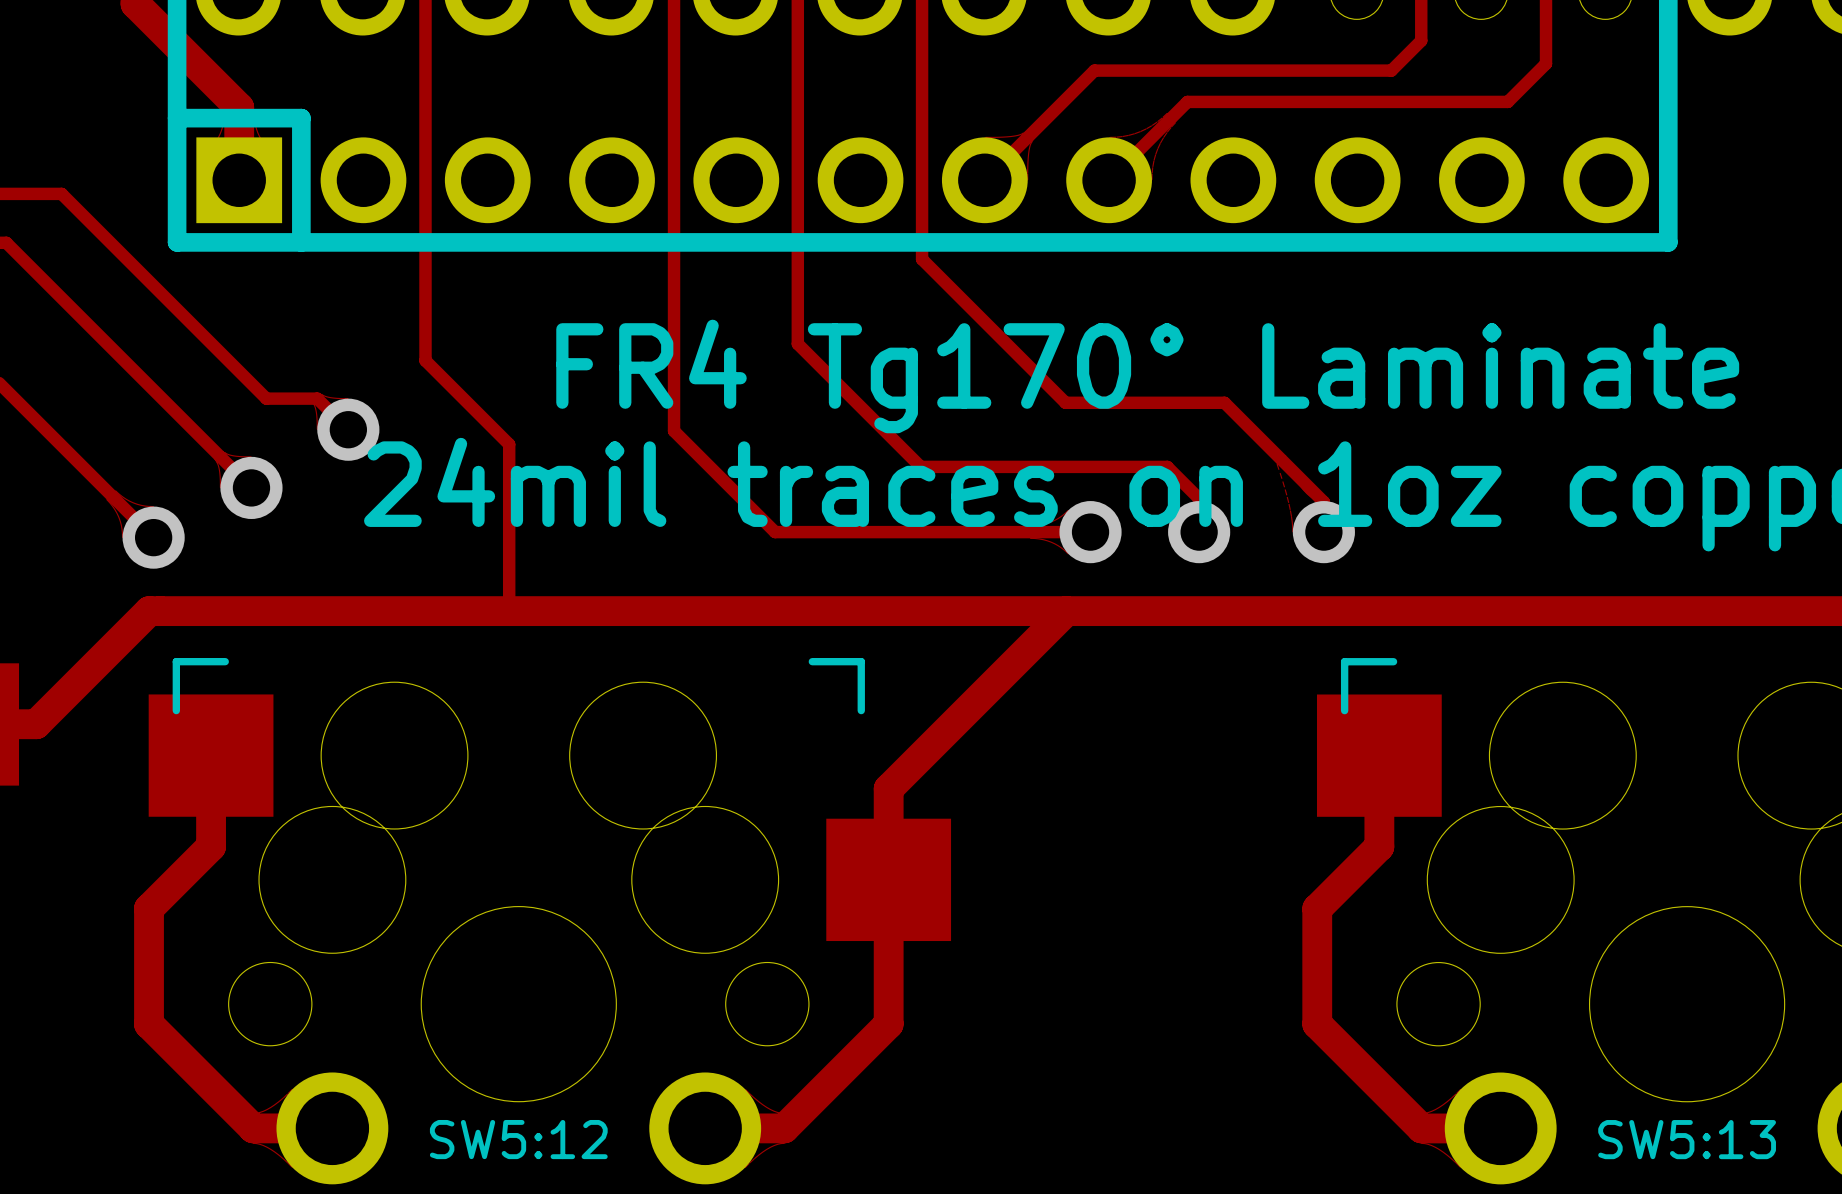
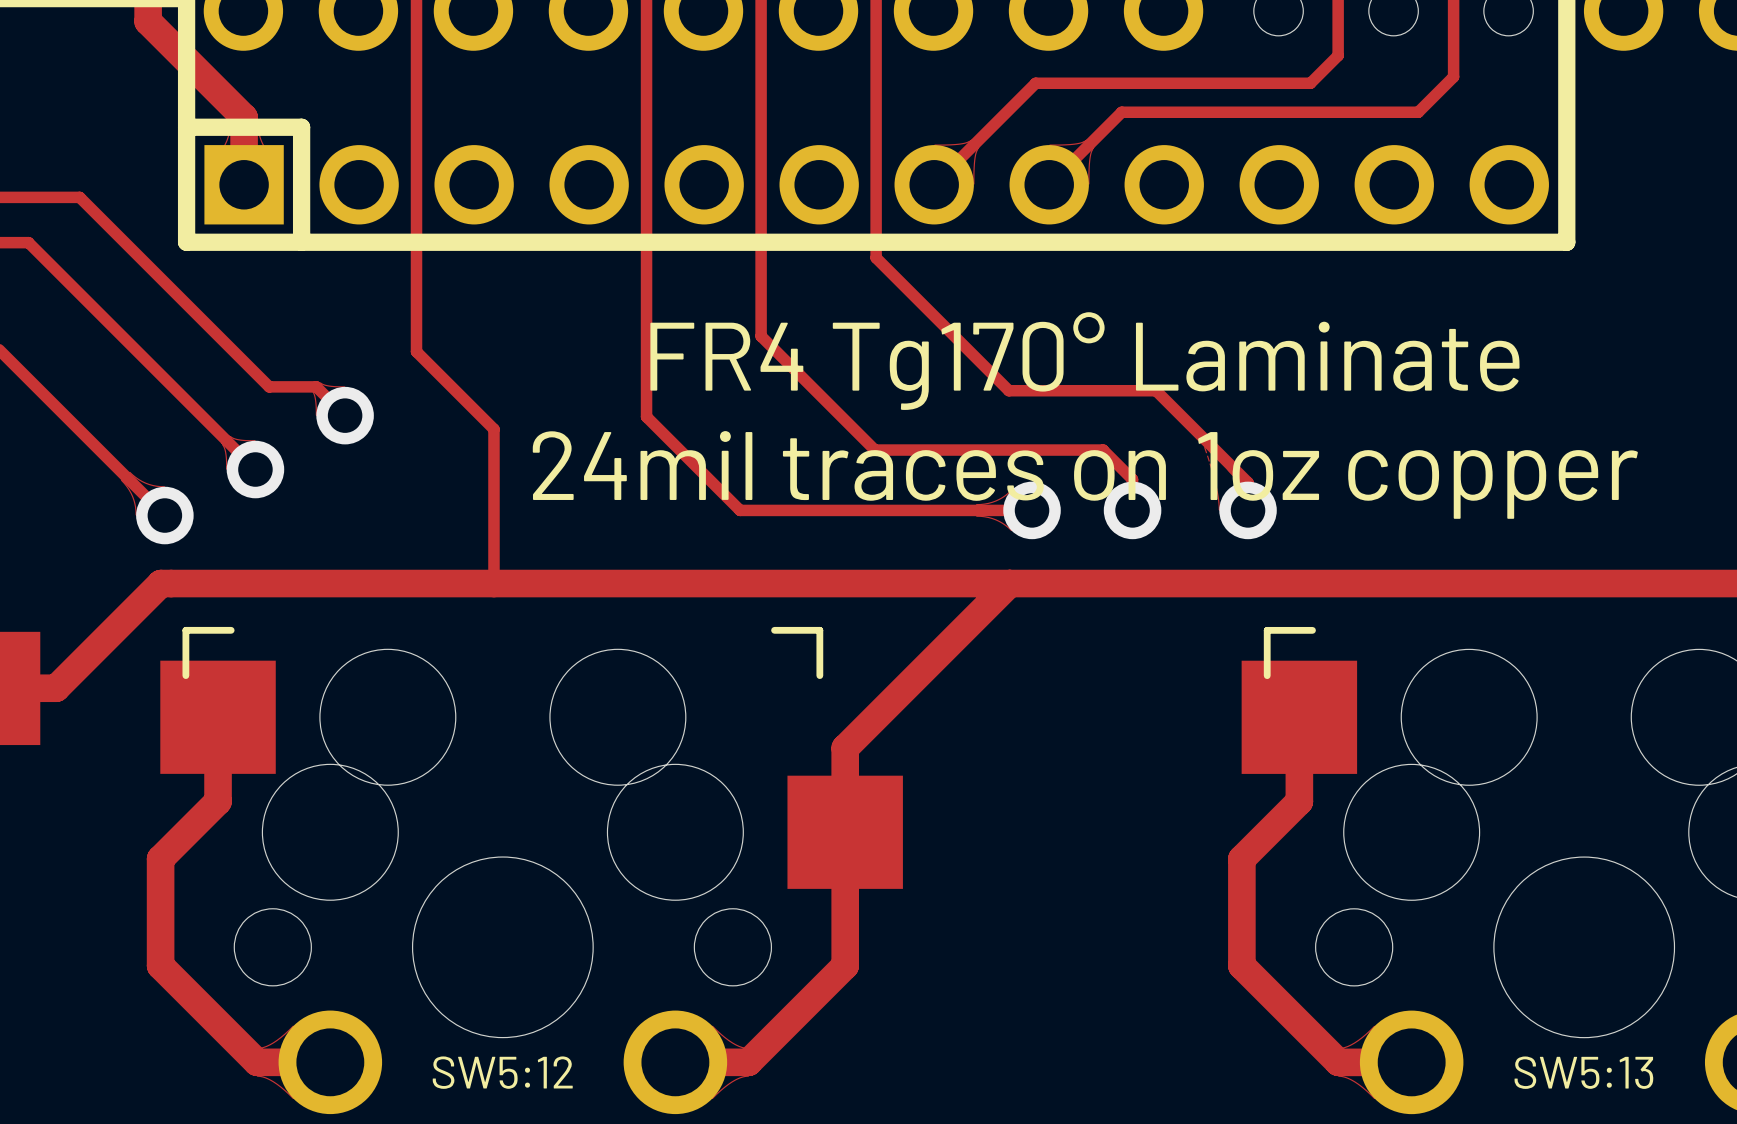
zone outline: (1109, 137) (1128, 135) (1140, 131) (1157, 122) (1167, 113) (1176, 122) (1163, 137) (1157, 148) (1153, 160) (1151, 179) -> (1049, 145) (1073, 144) (1084, 141) (1092, 149) (1089, 160) (1088, 184)

